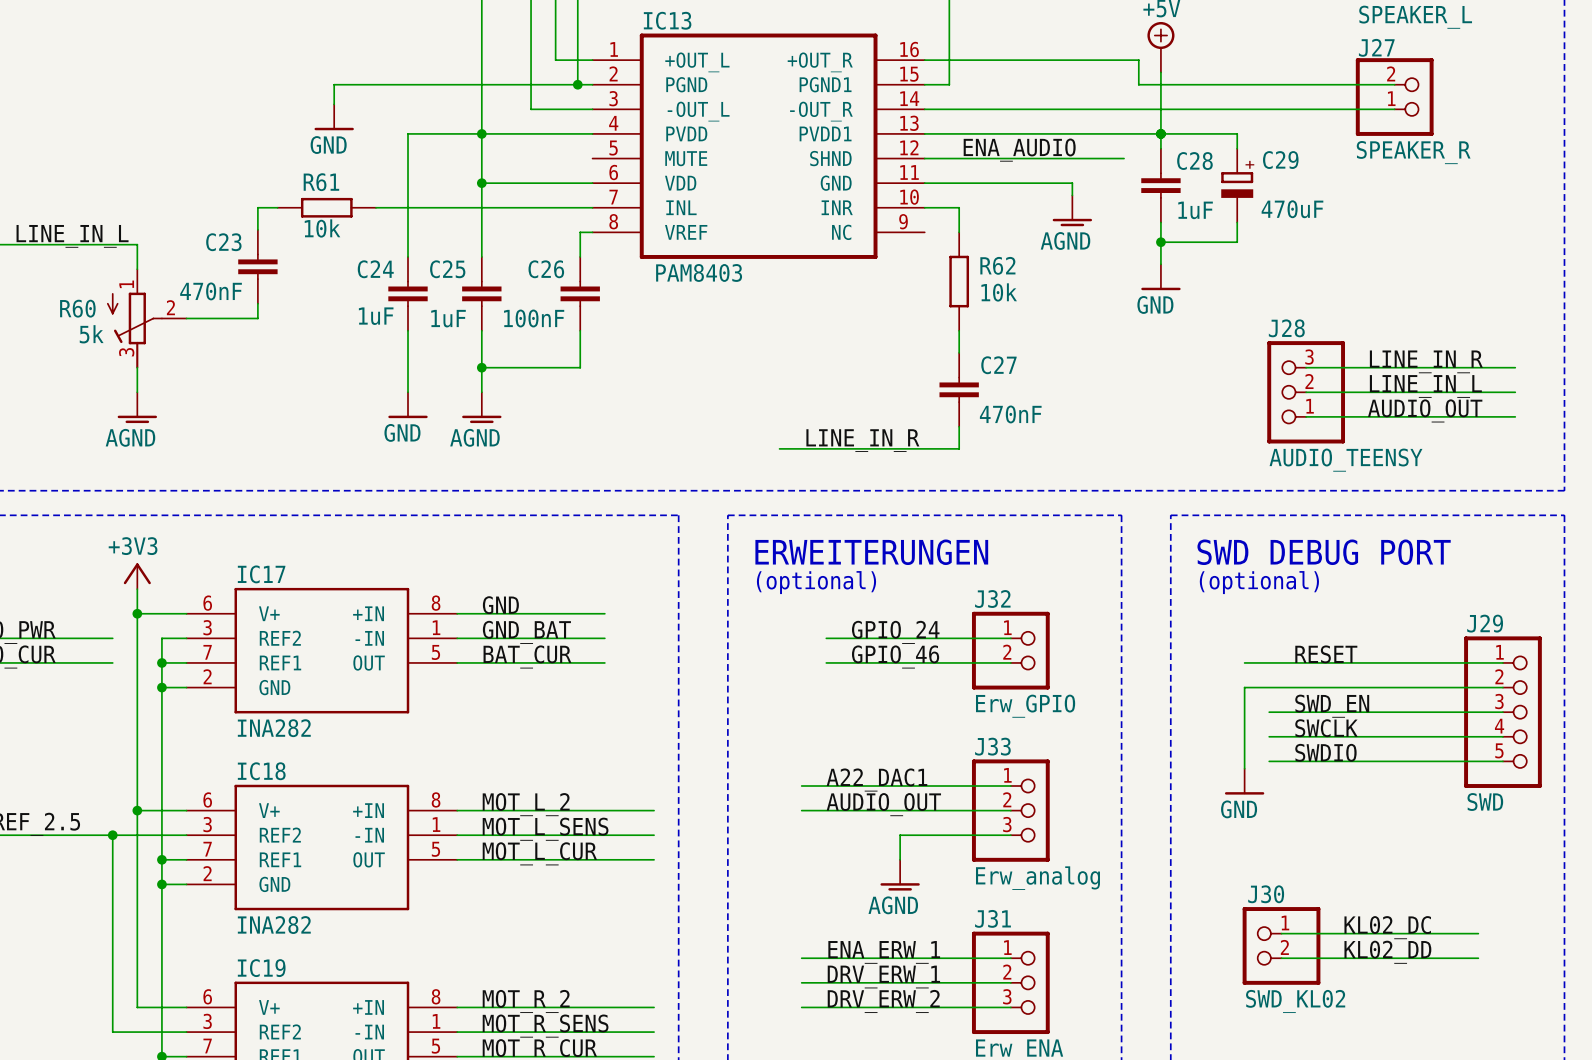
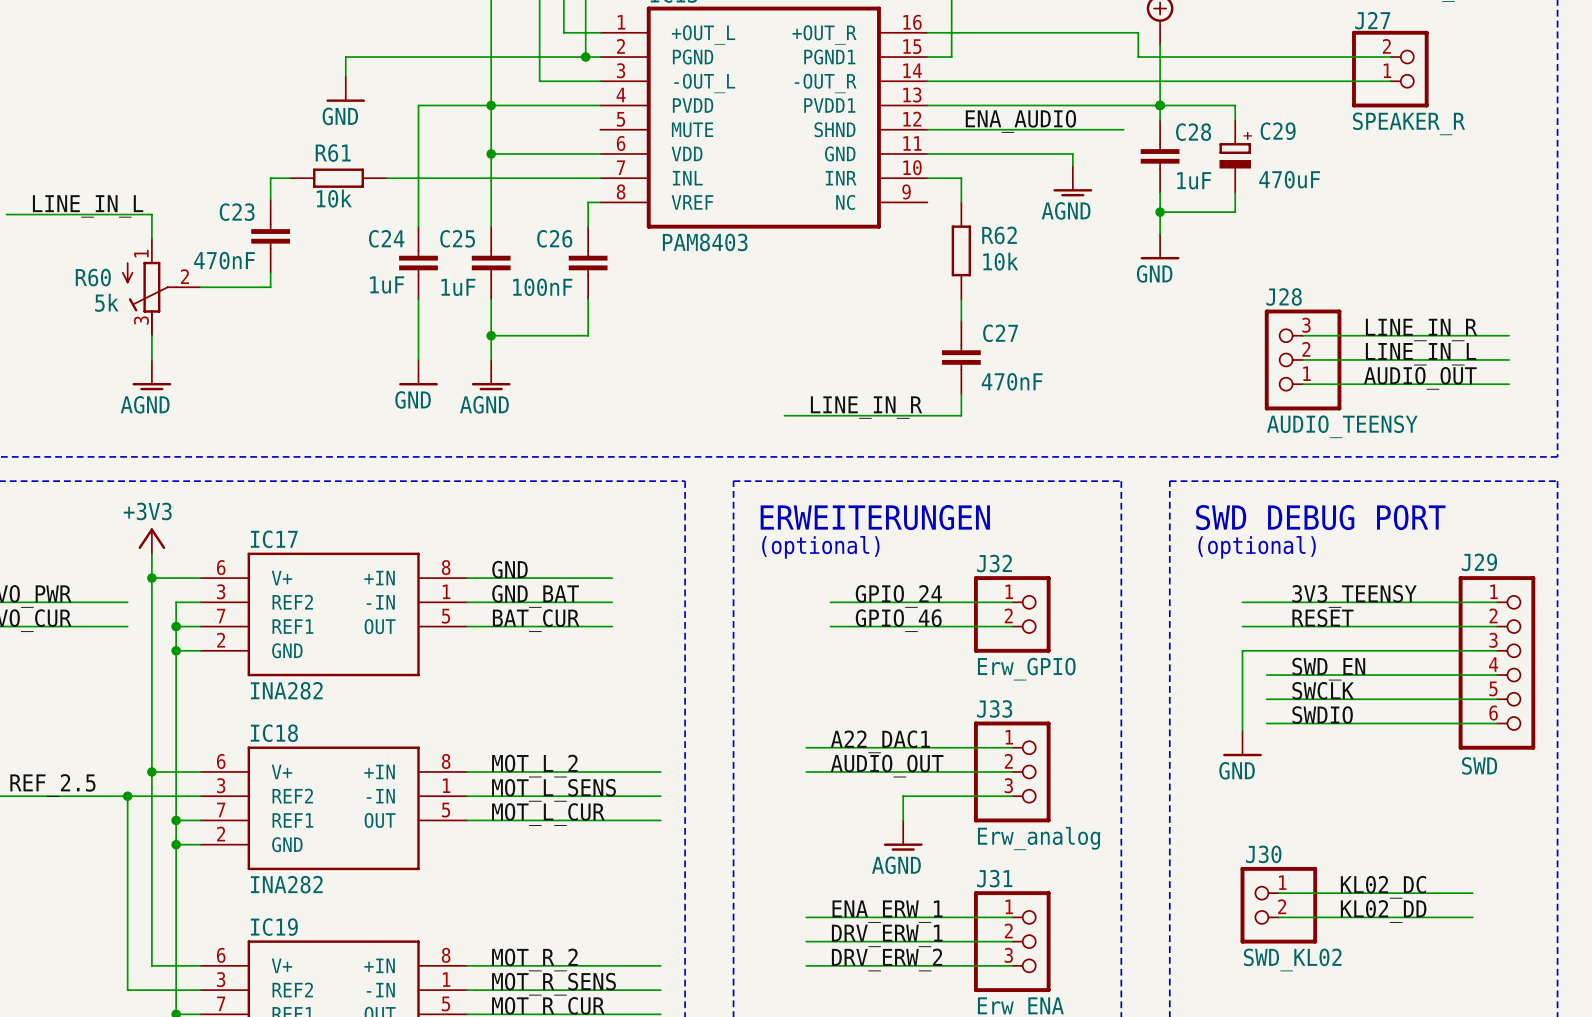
label: none -> 3V3_TEENSY (1354, 596)
J29 symbol: [1464, 636, 1542, 788] -> [1458, 576, 1536, 750]
wire: none -> (1242, 602) (1496, 602)

